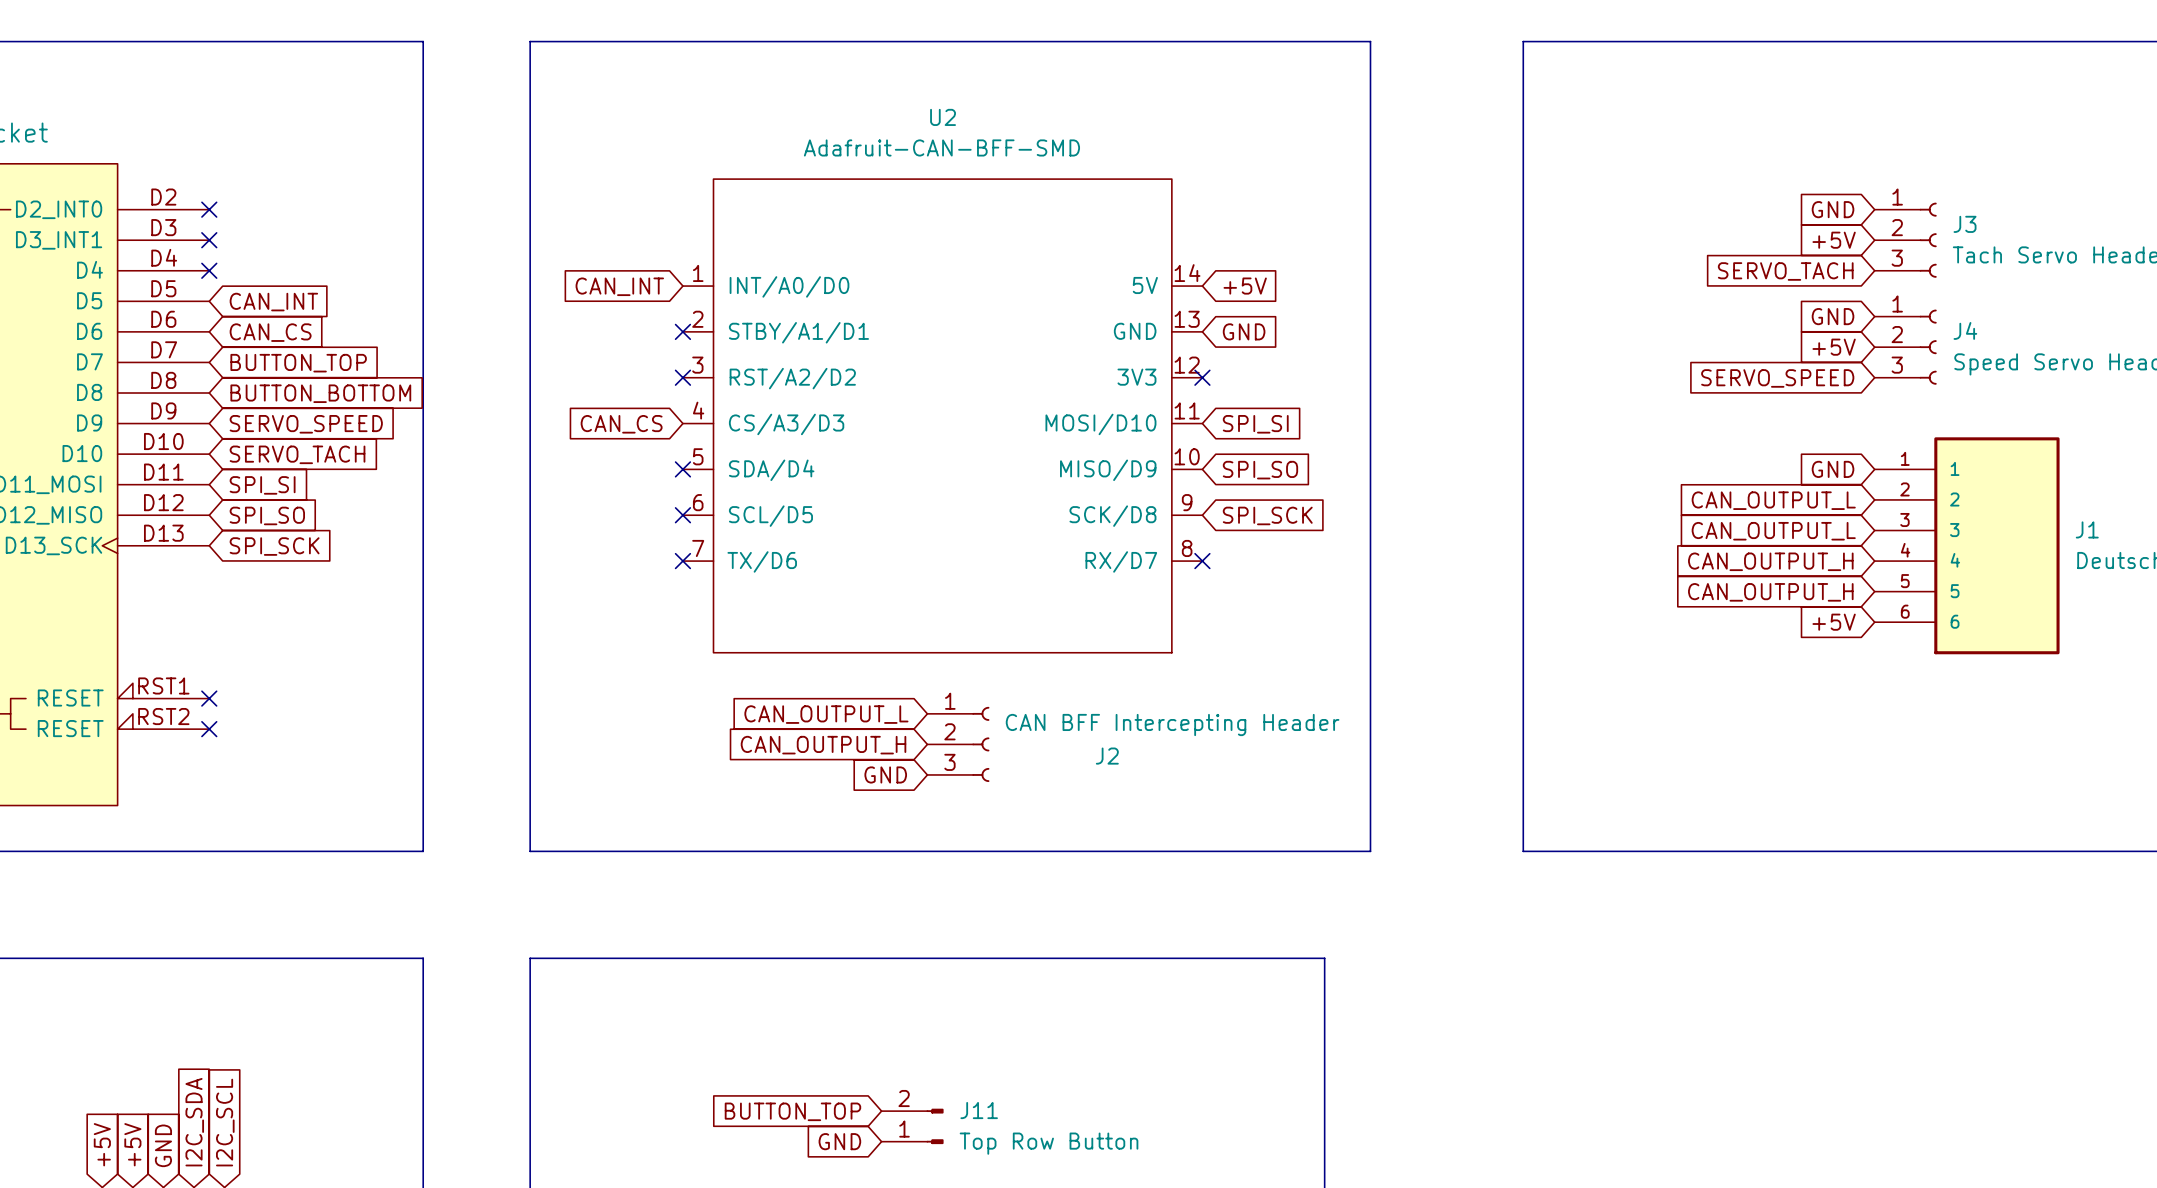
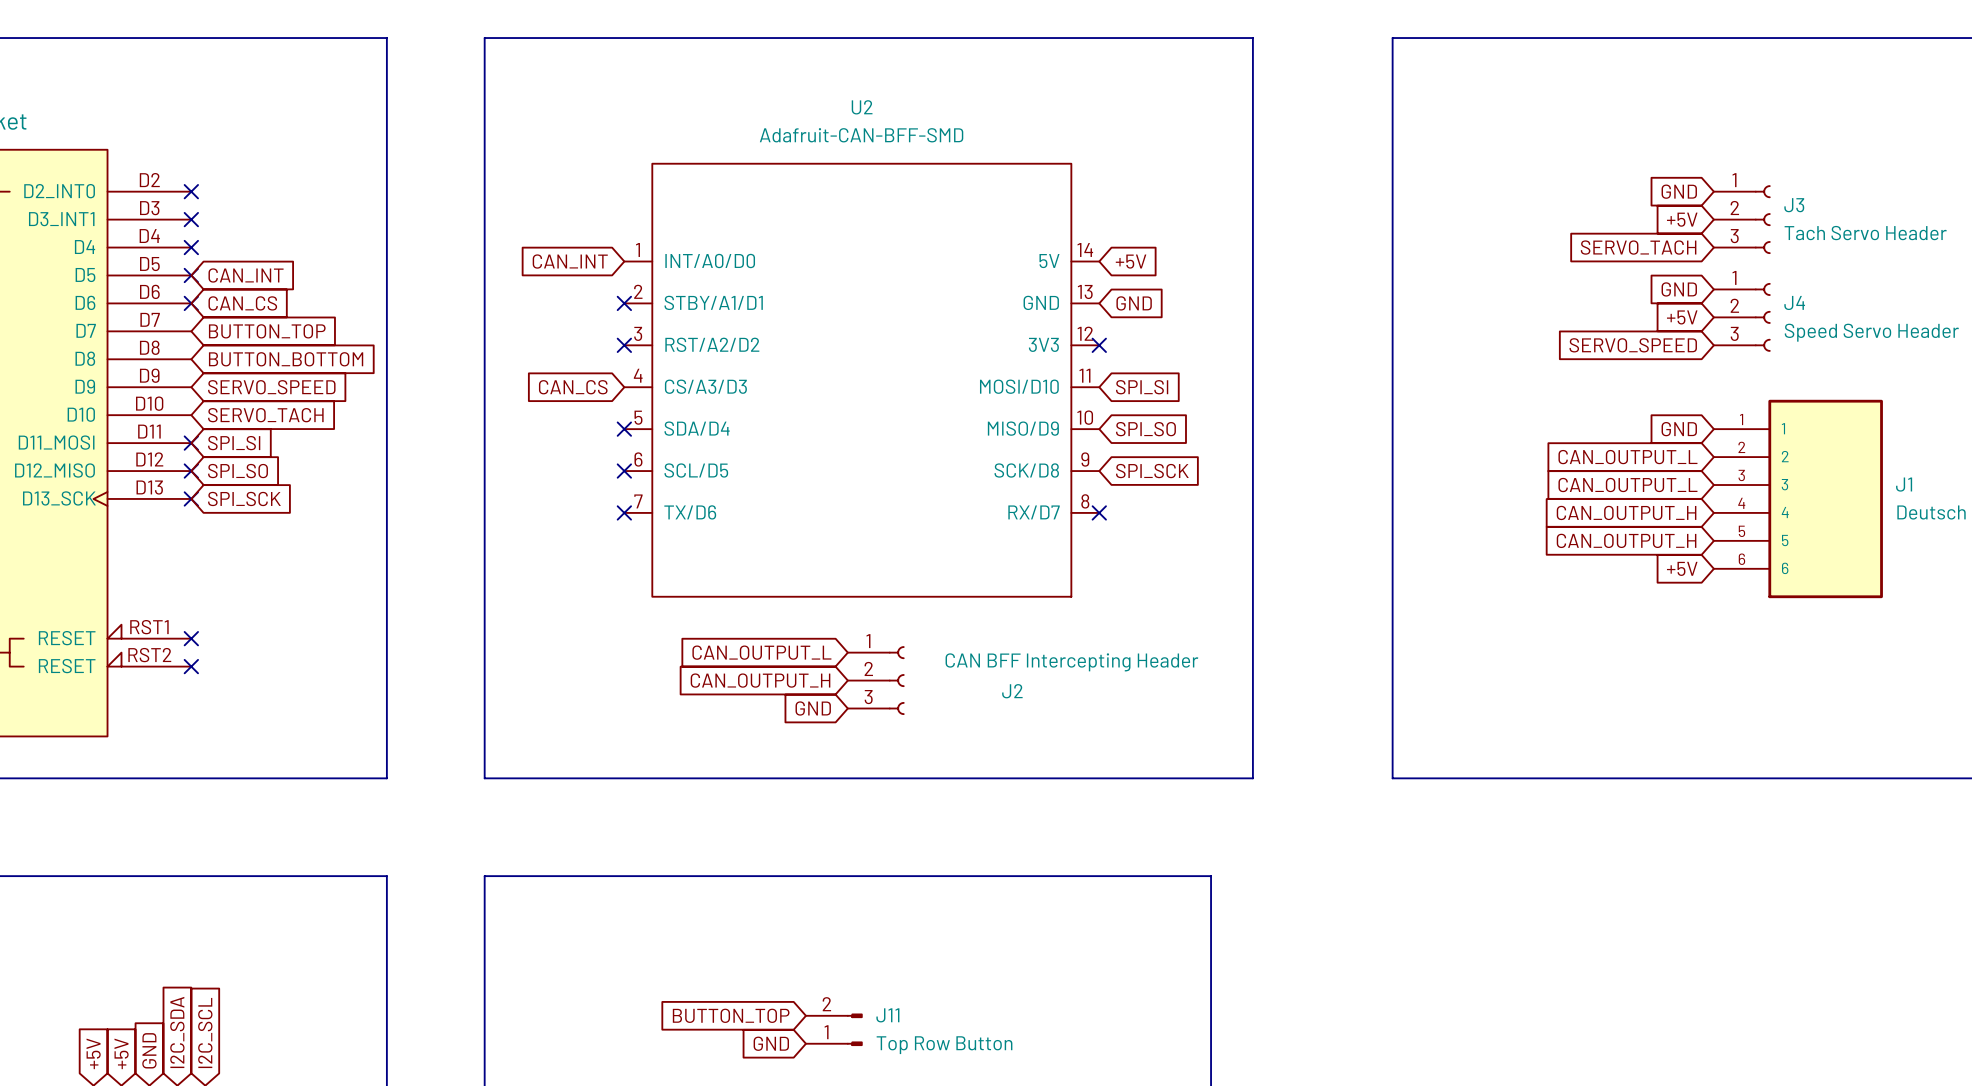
no-connect mark: none -> (191, 275)
no-connect mark: none -> (191, 303)
no-connect mark: none -> (191, 443)
no-connect mark: none -> (191, 471)
no-connect mark: none -> (191, 498)

